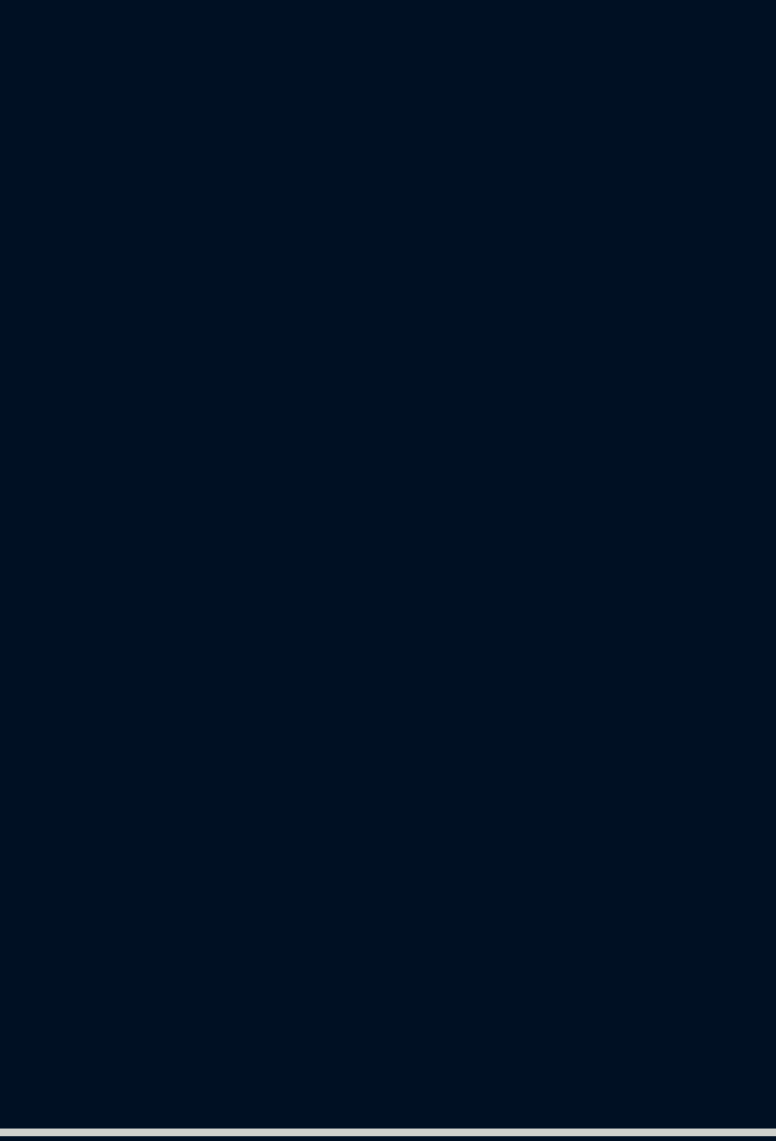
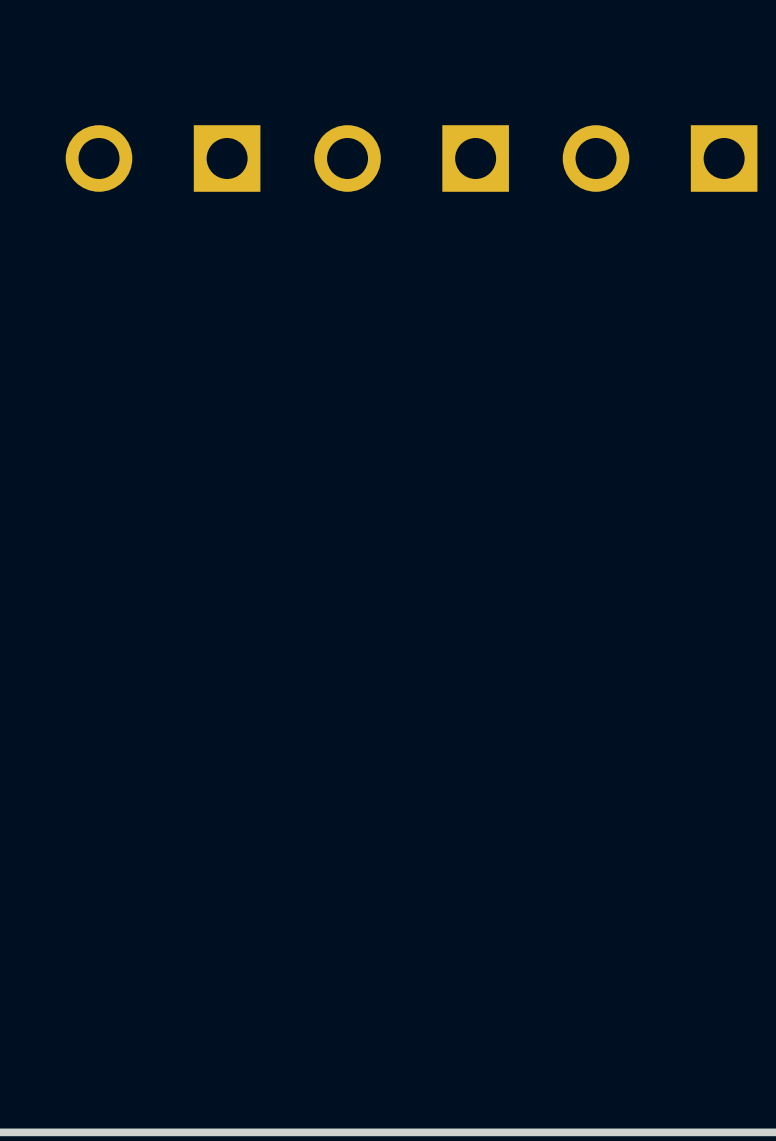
part: none -> (163, 158)
part: none -> (411, 158)
part: none -> (660, 158)

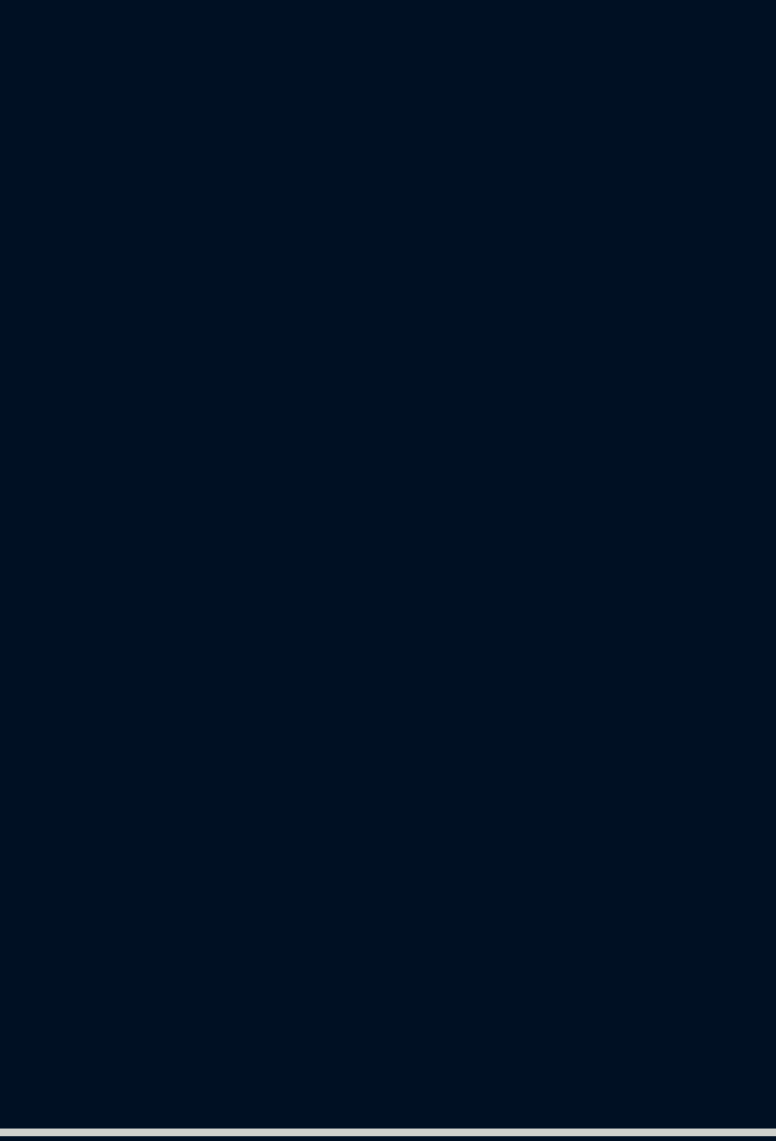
part: (163, 158) -> none
part: (411, 158) -> none
part: (660, 158) -> none

